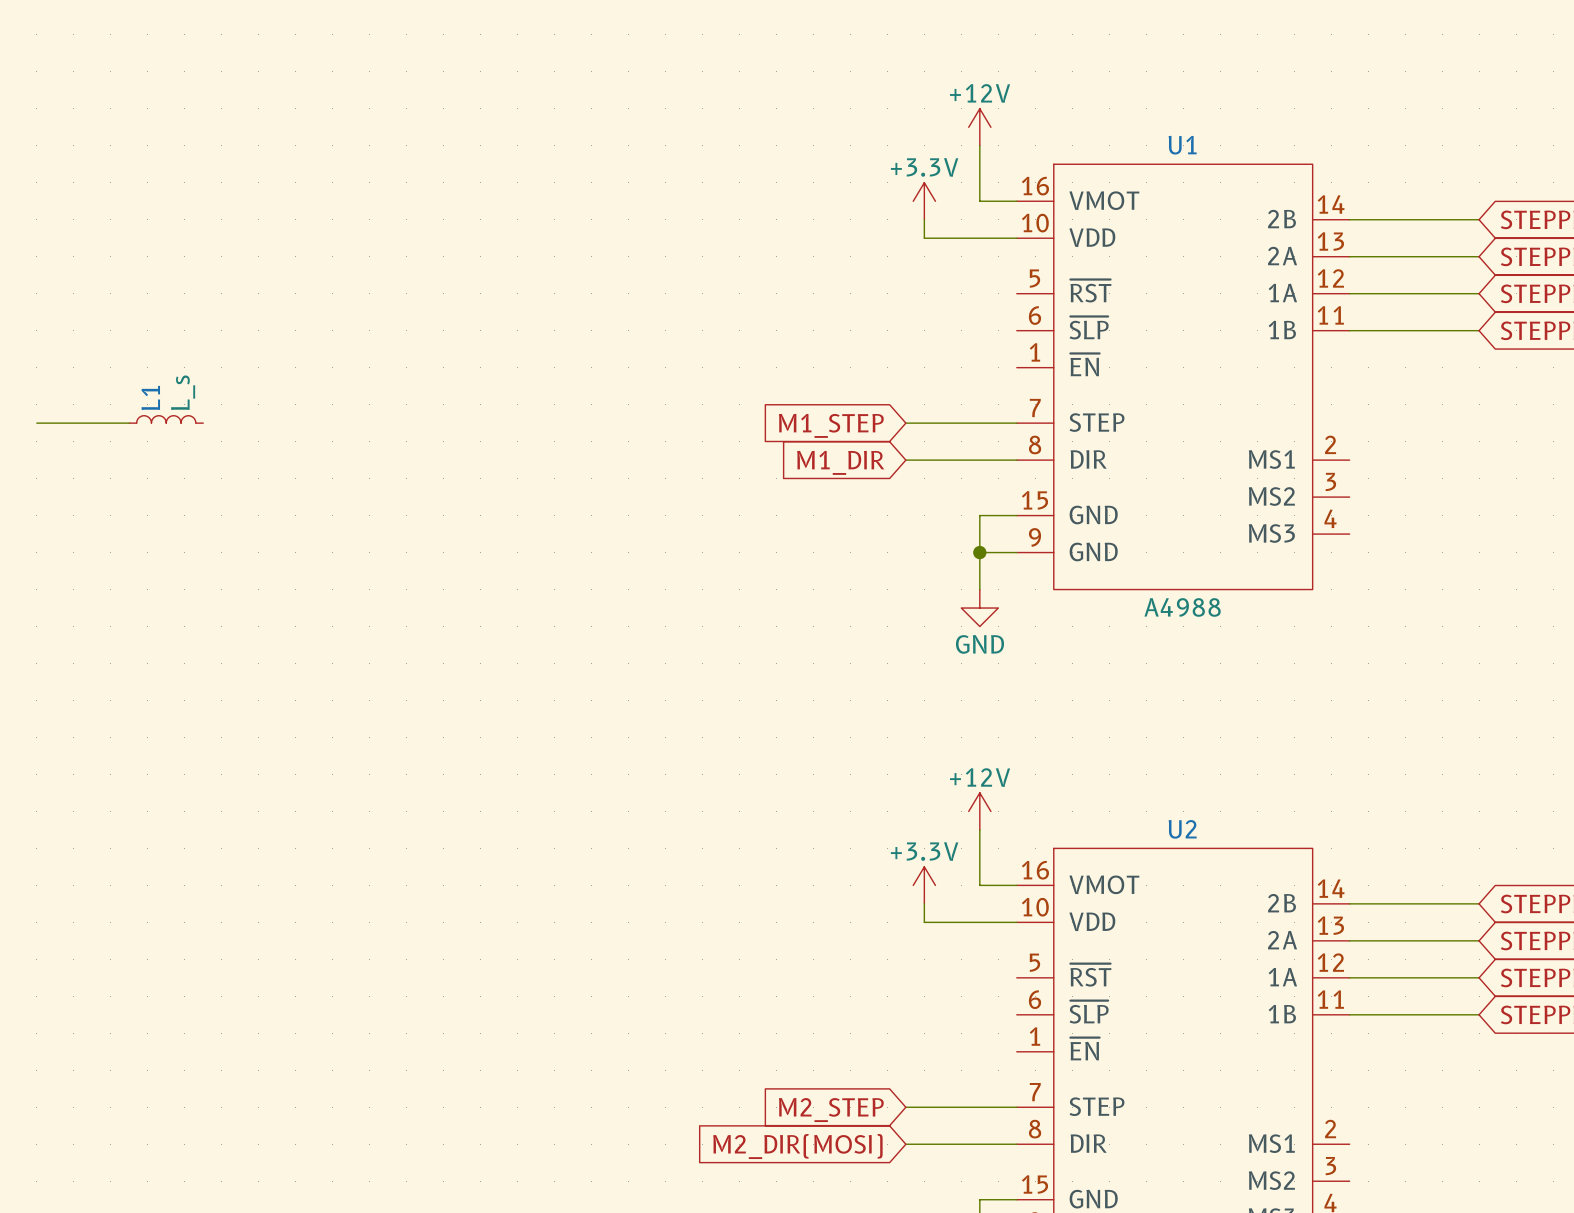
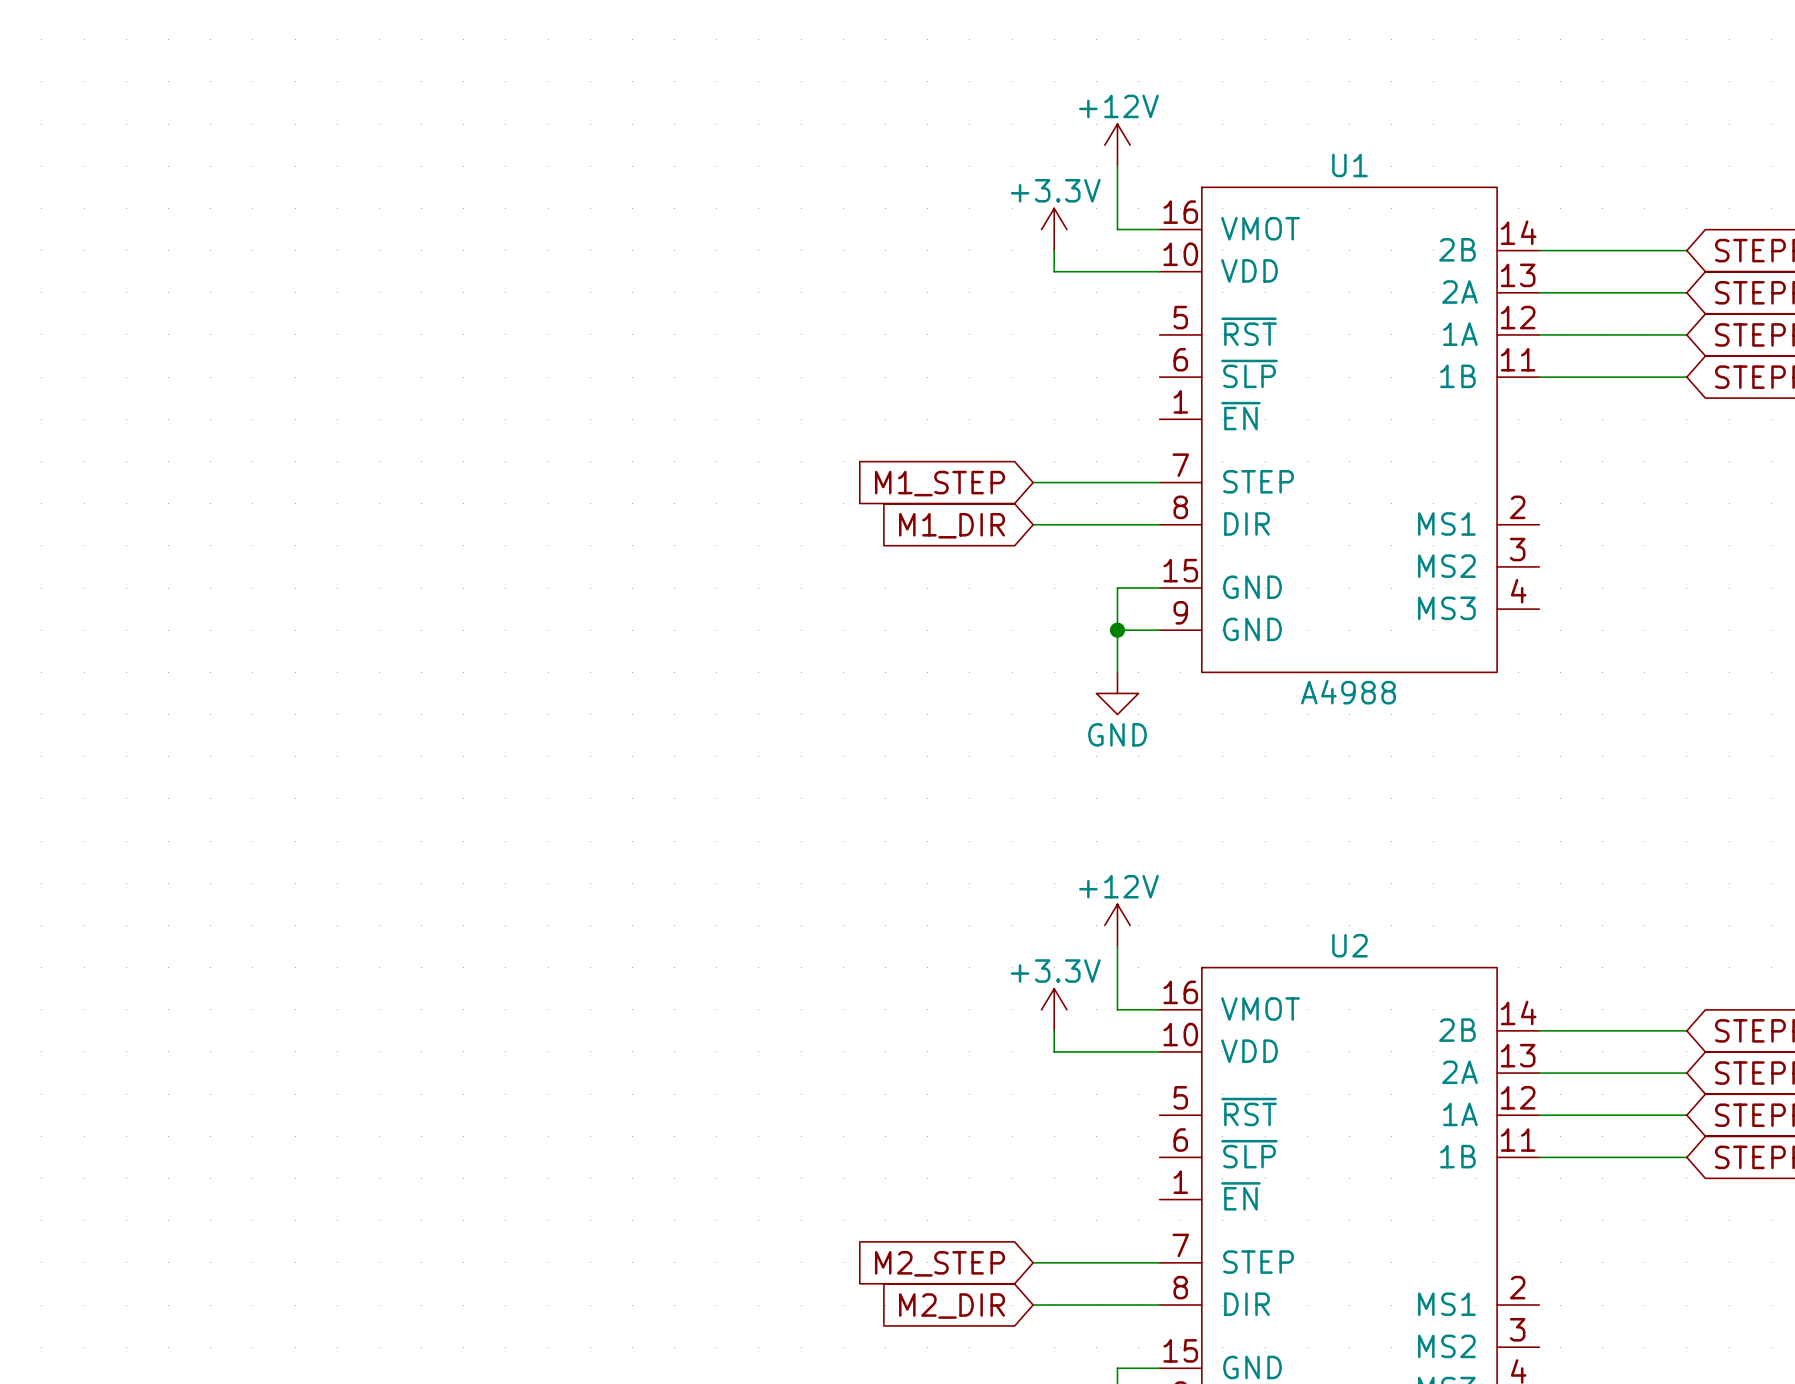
L1: L_s (166, 419) -> none
wire: (36, 423) (129, 423) -> none
global label: M2_DIR(MOSI) (797, 1146) -> M2_DIR (952, 1306)

